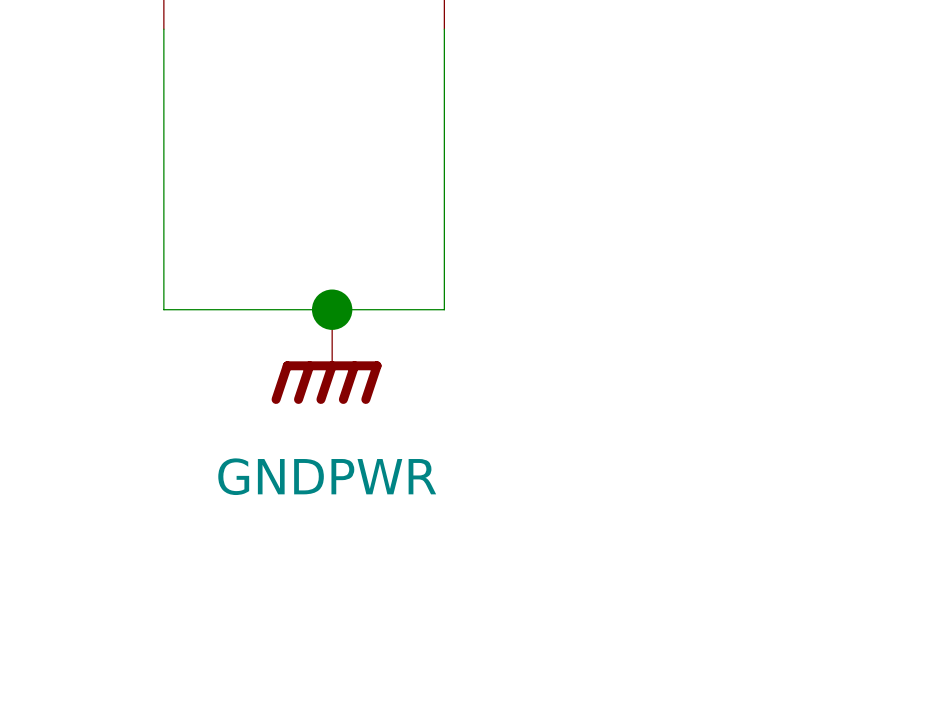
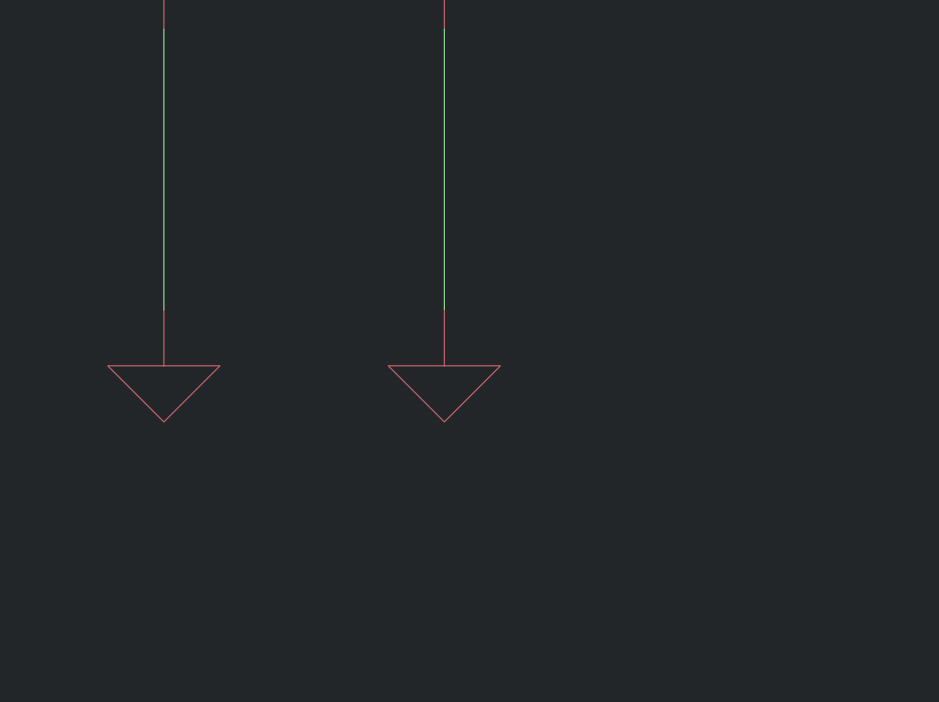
wire: (163, 309) (444, 309) -> none
junction: (332, 309) -> none
power symbol: GNDPWR (326, 356) -> none
power symbol: none -> (163, 365)
power symbol: none -> (444, 365)

